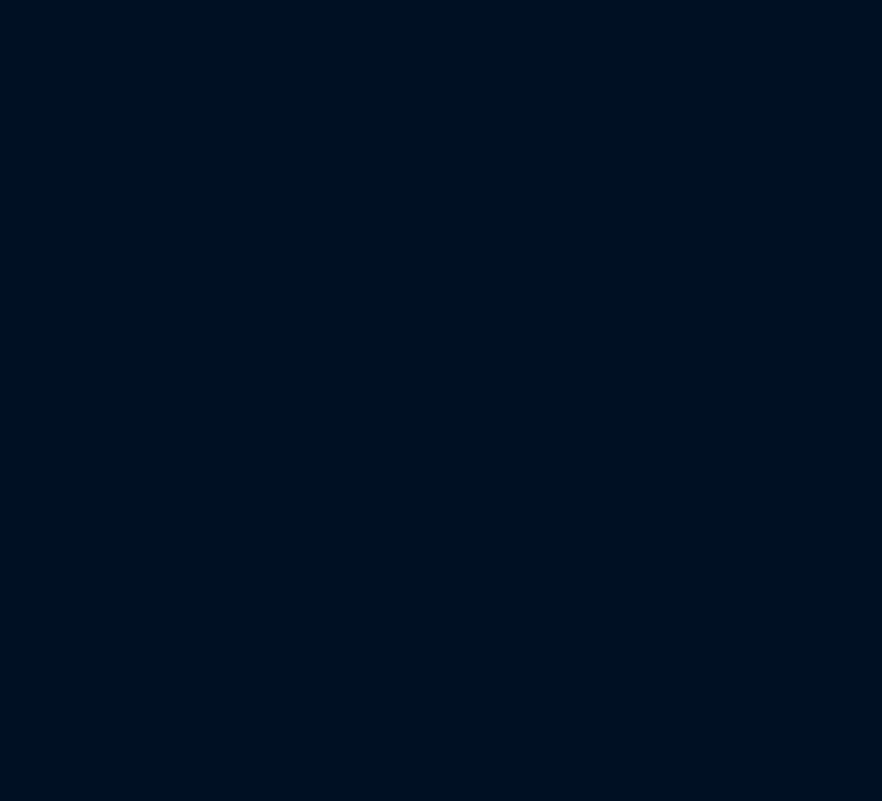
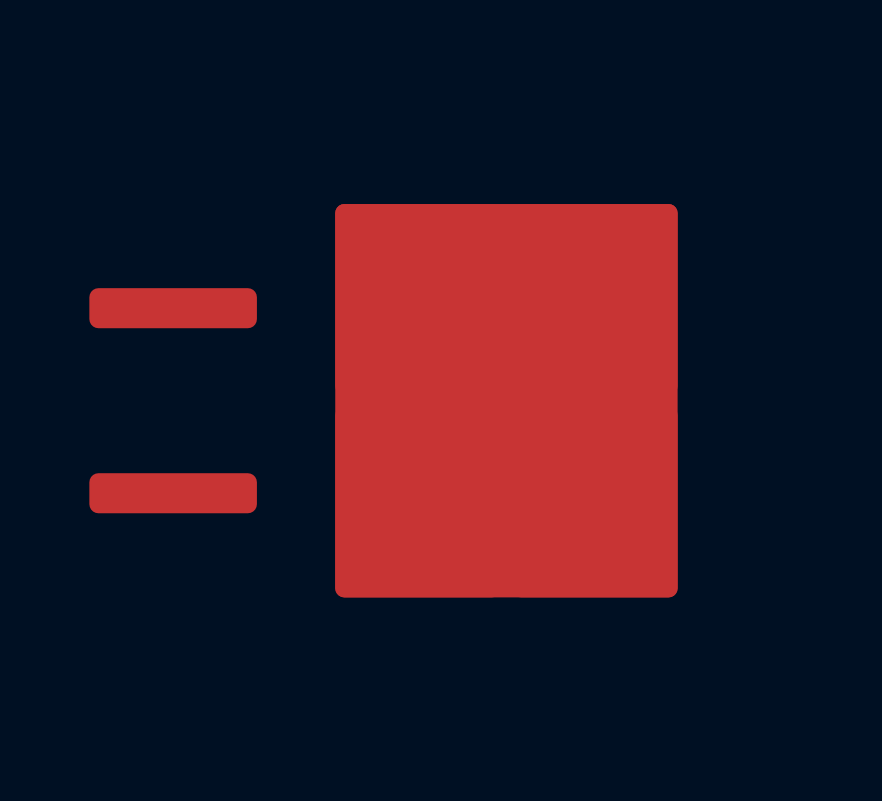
part: none -> (383, 400)

